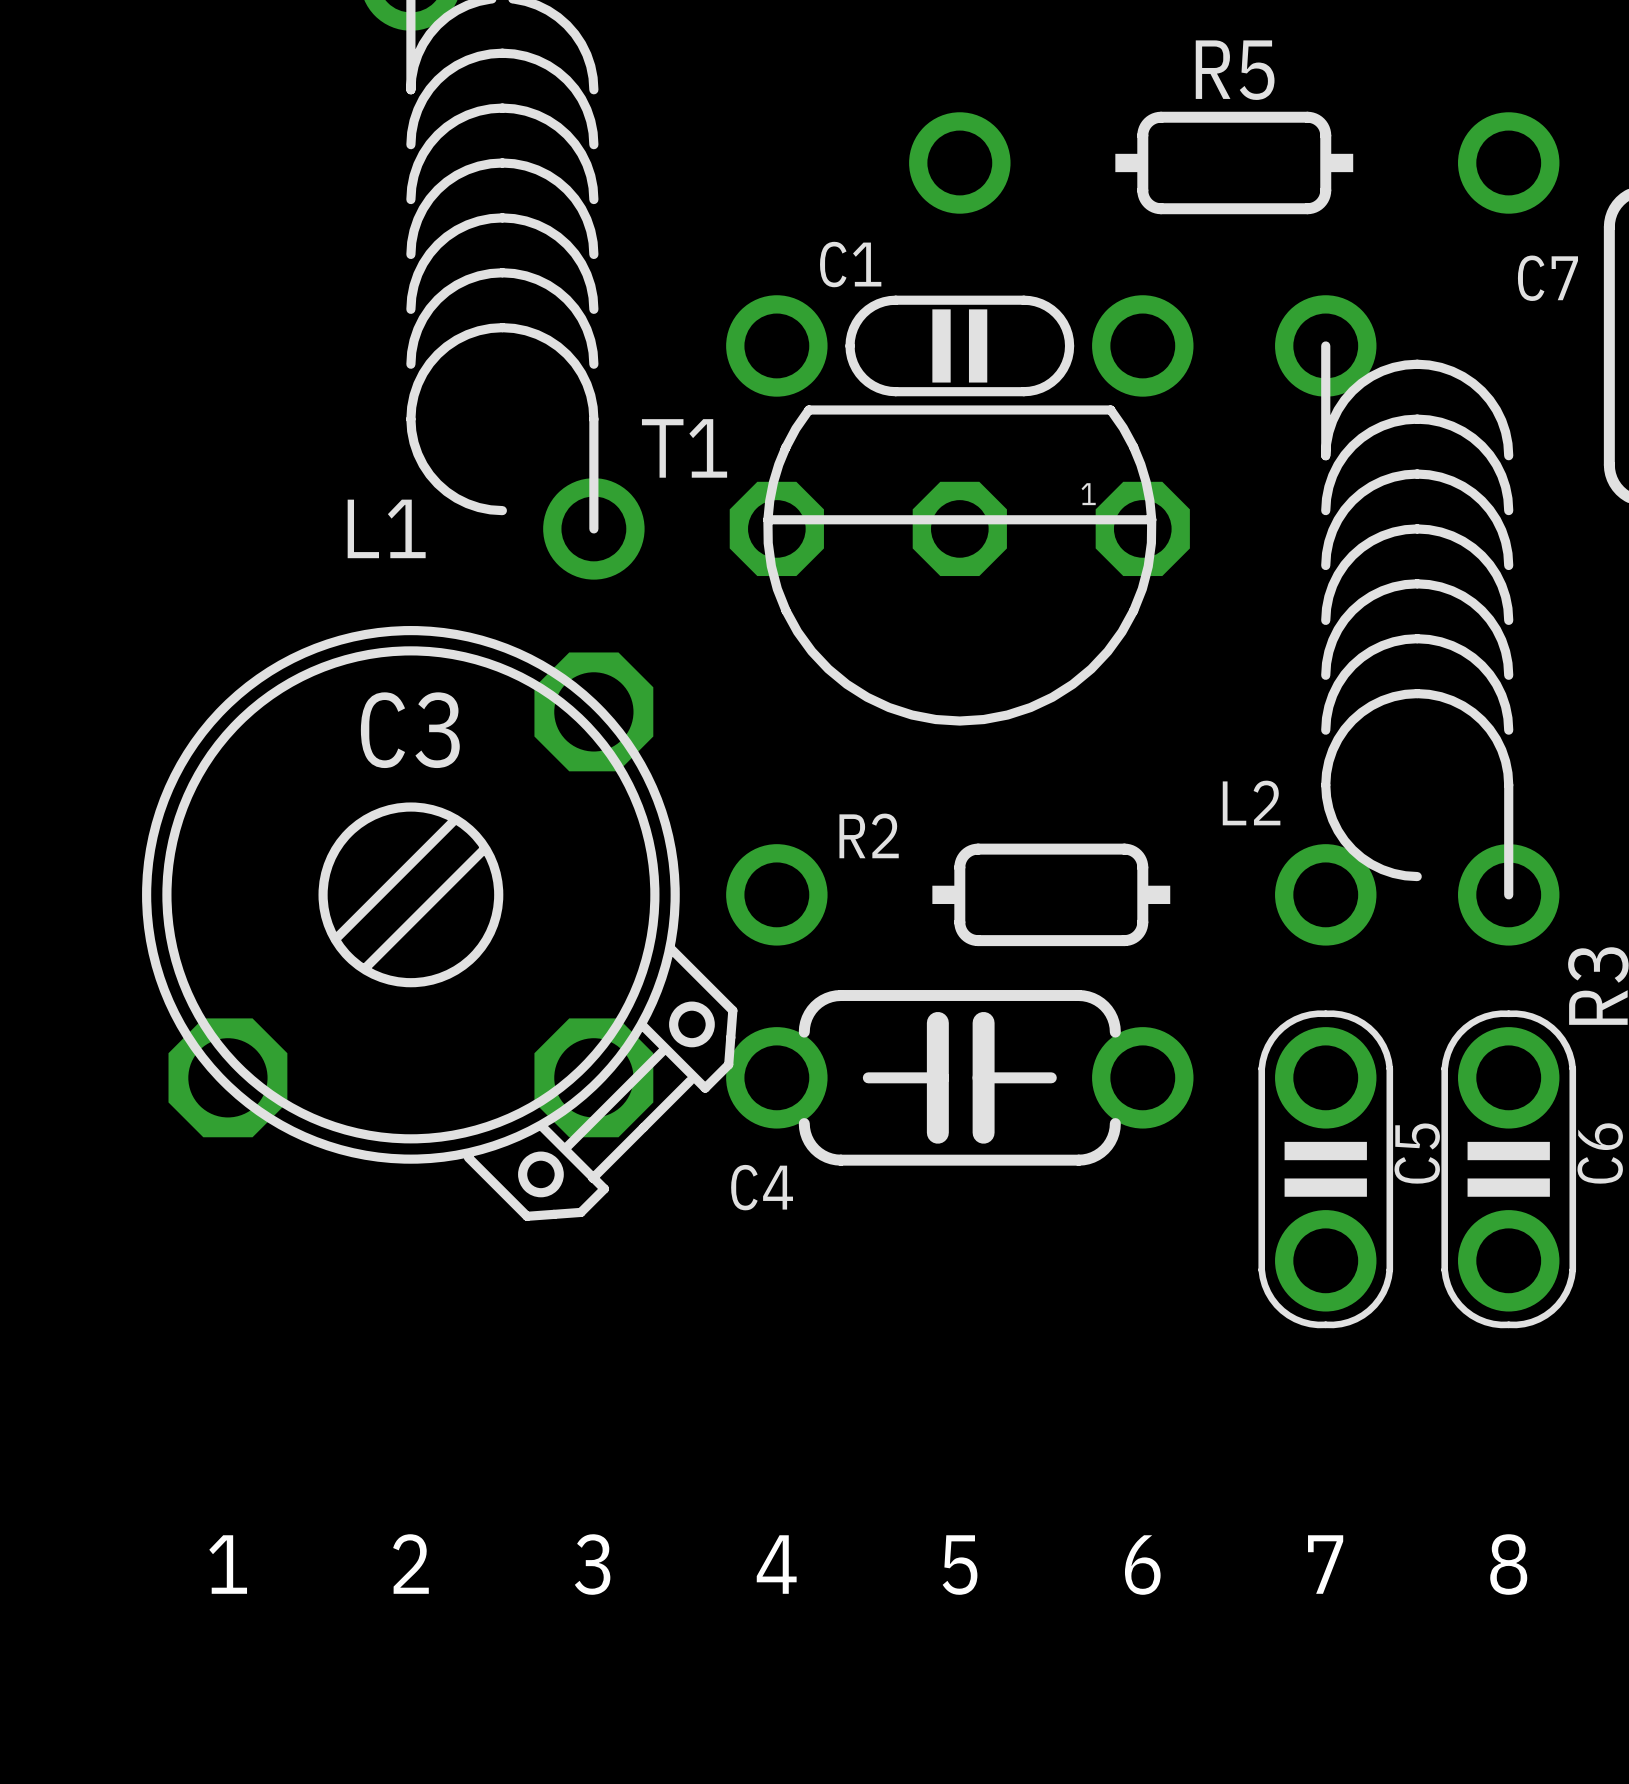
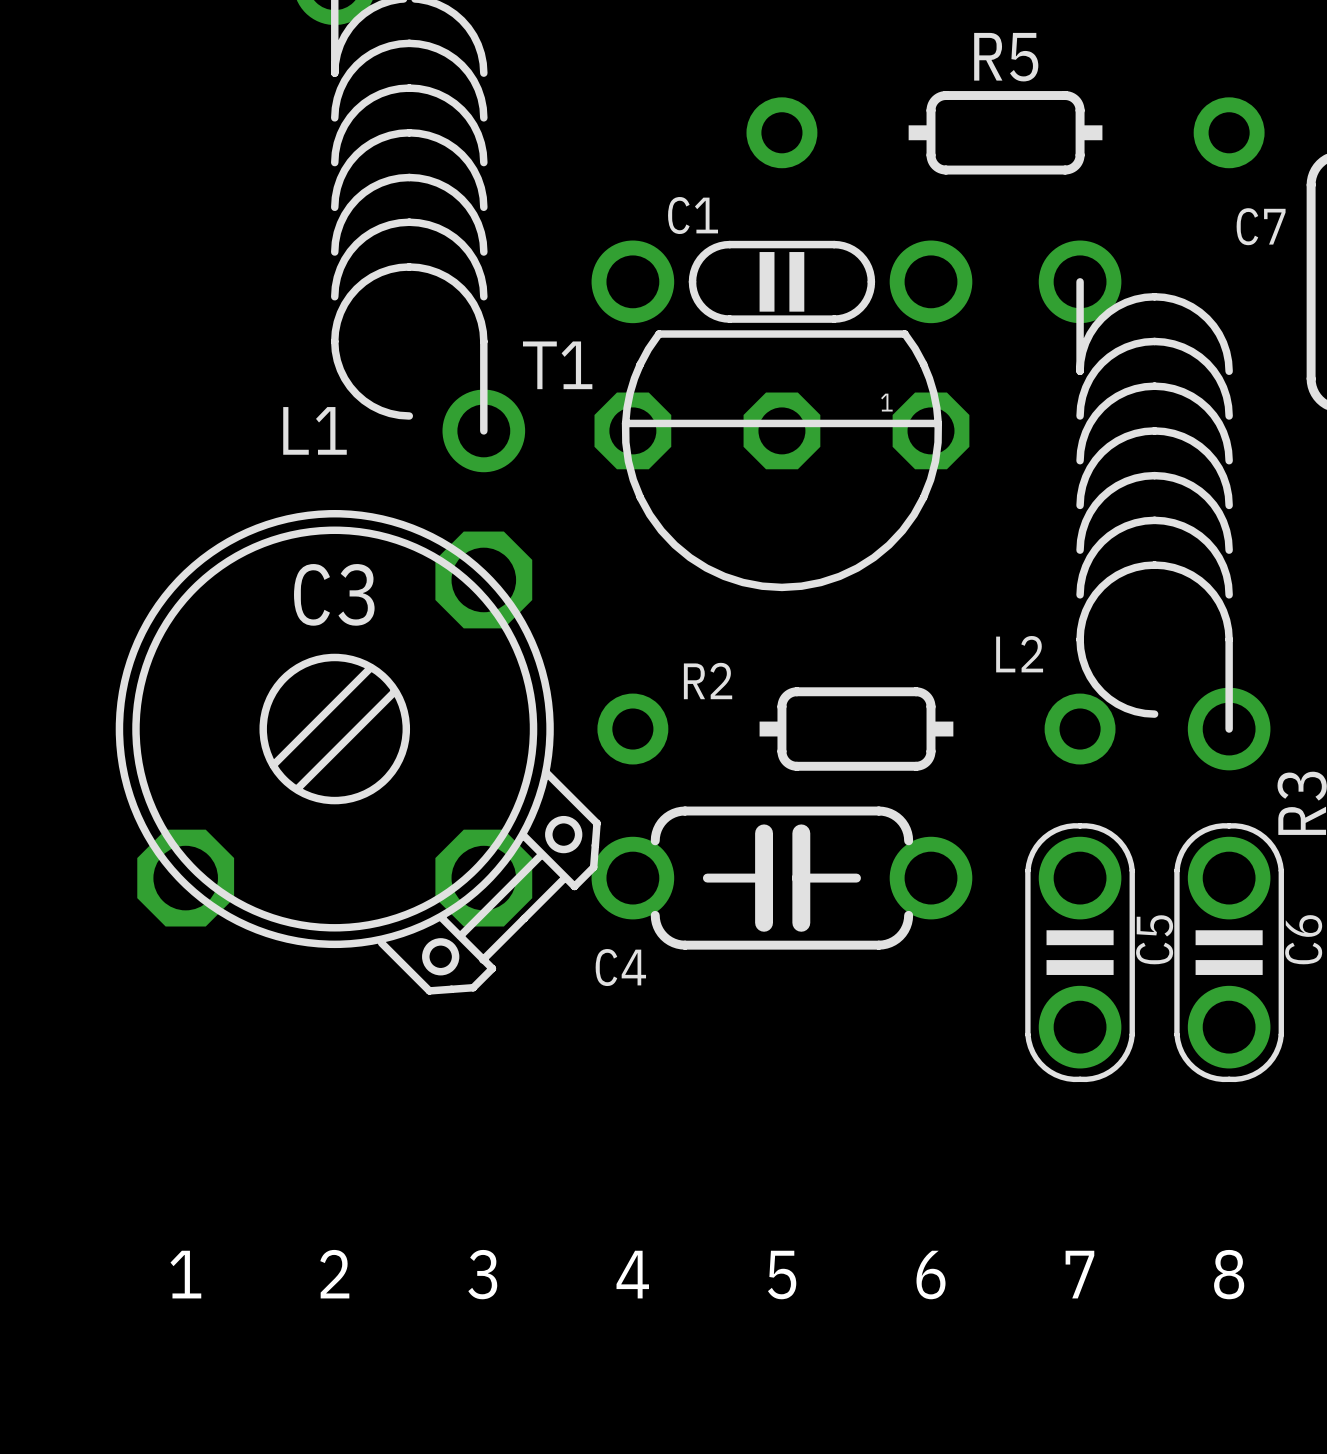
R5 footprint: [909, 111, 1560, 215] -> [746, 91, 1265, 175]
R2 footprint: [726, 843, 1377, 947] -> [597, 687, 1116, 771]

